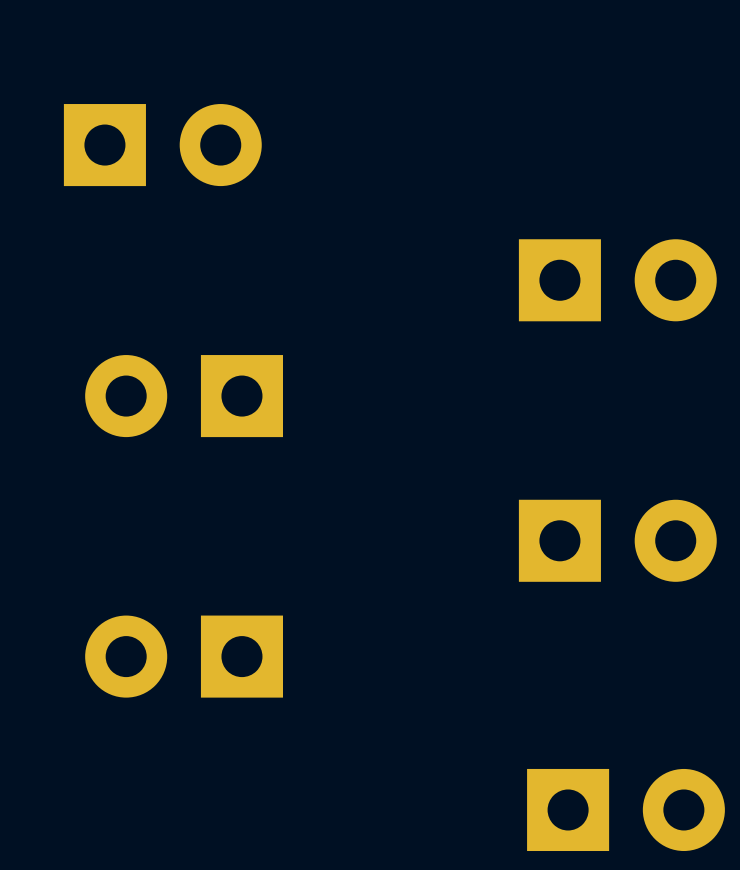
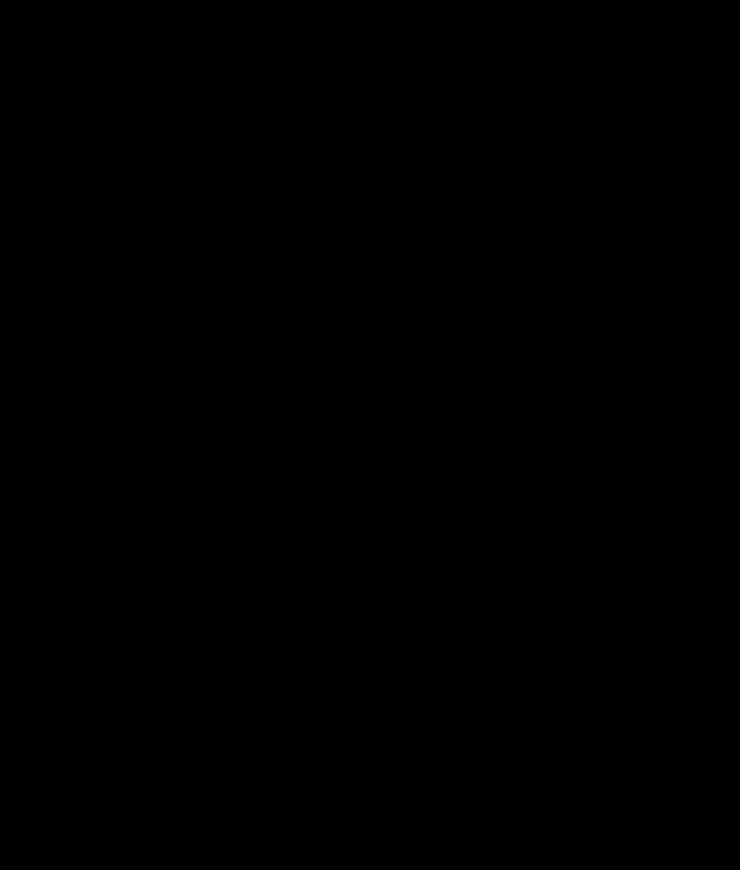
part: (162, 145) -> none
part: (617, 280) -> none
part: (184, 396) -> none
part: (617, 540) -> none
part: (184, 656) -> none
part: (625, 809) -> none

